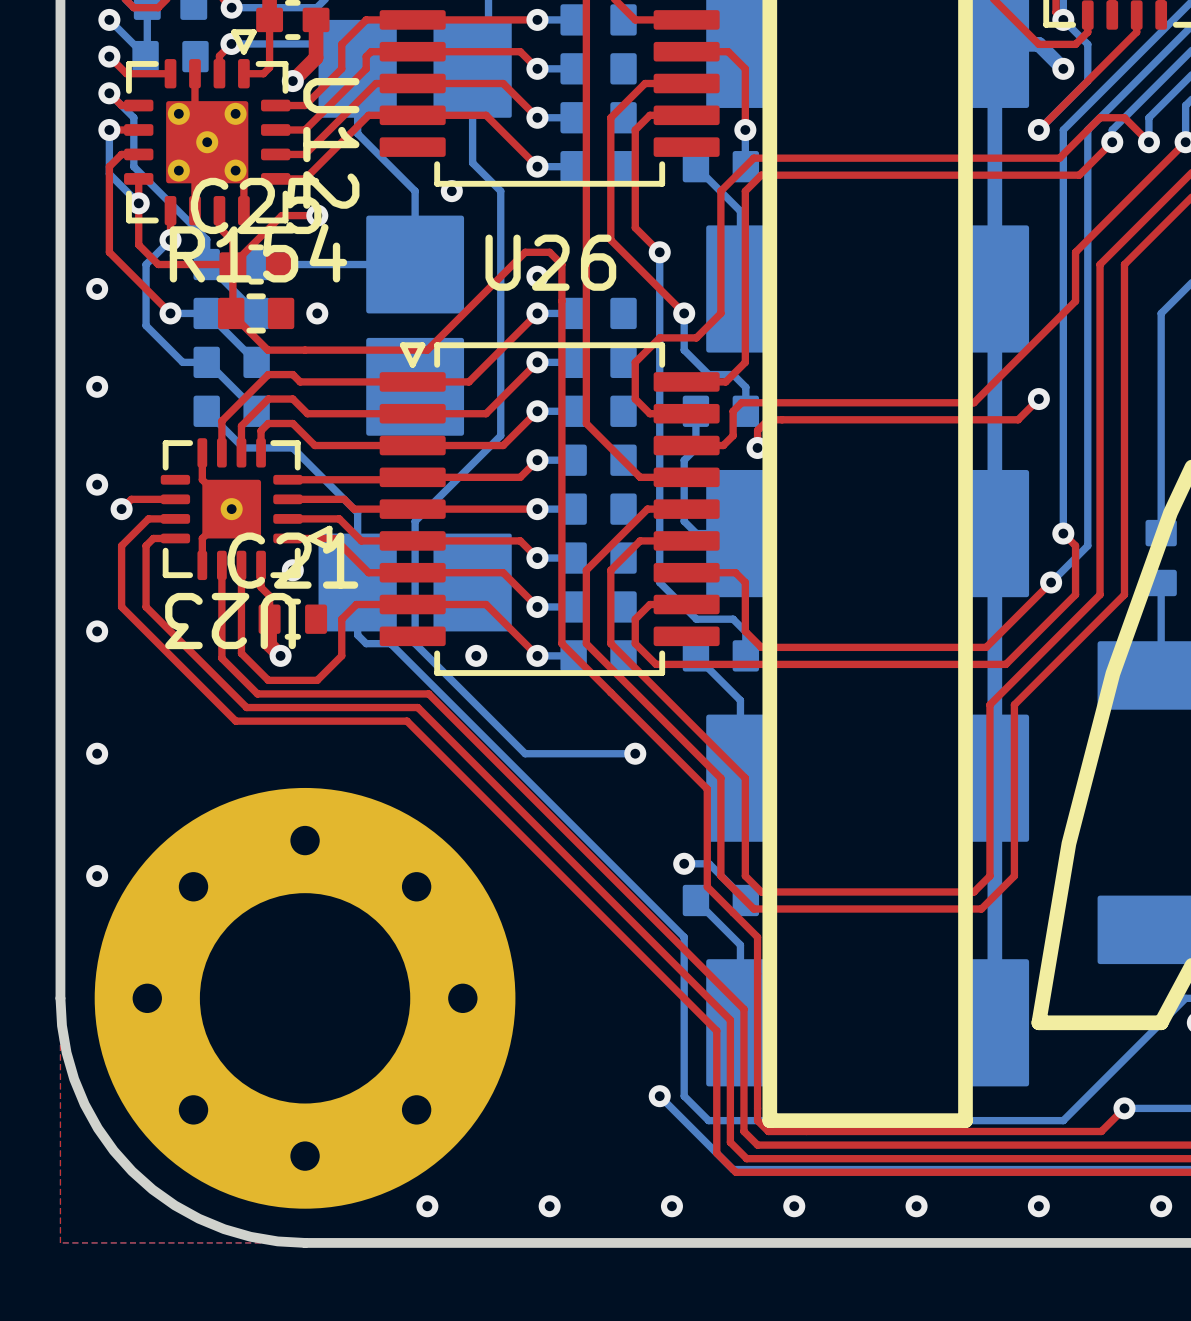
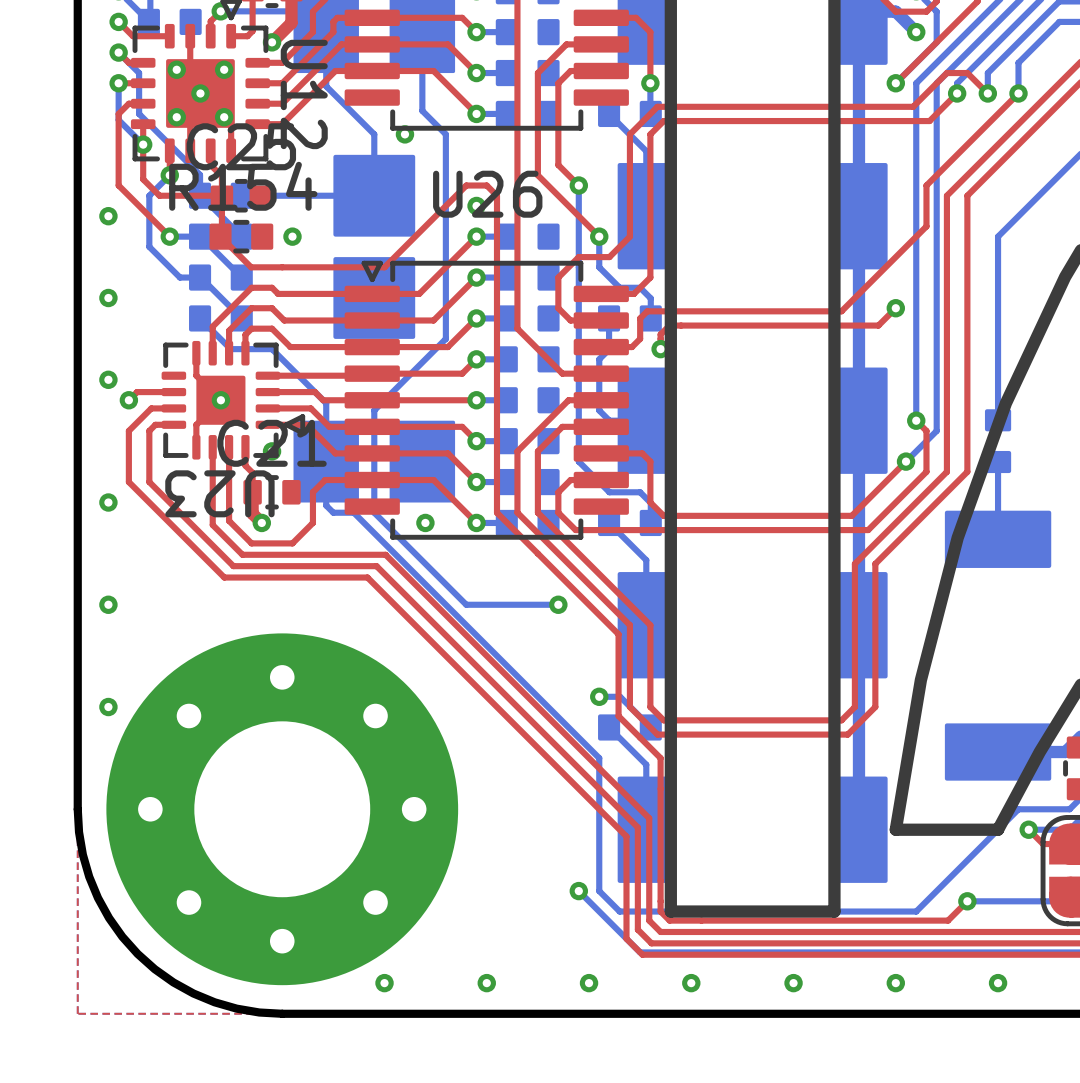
top track: (317, 215) (281, 215) (232, 264) -> none
via: (317, 215) -> none

